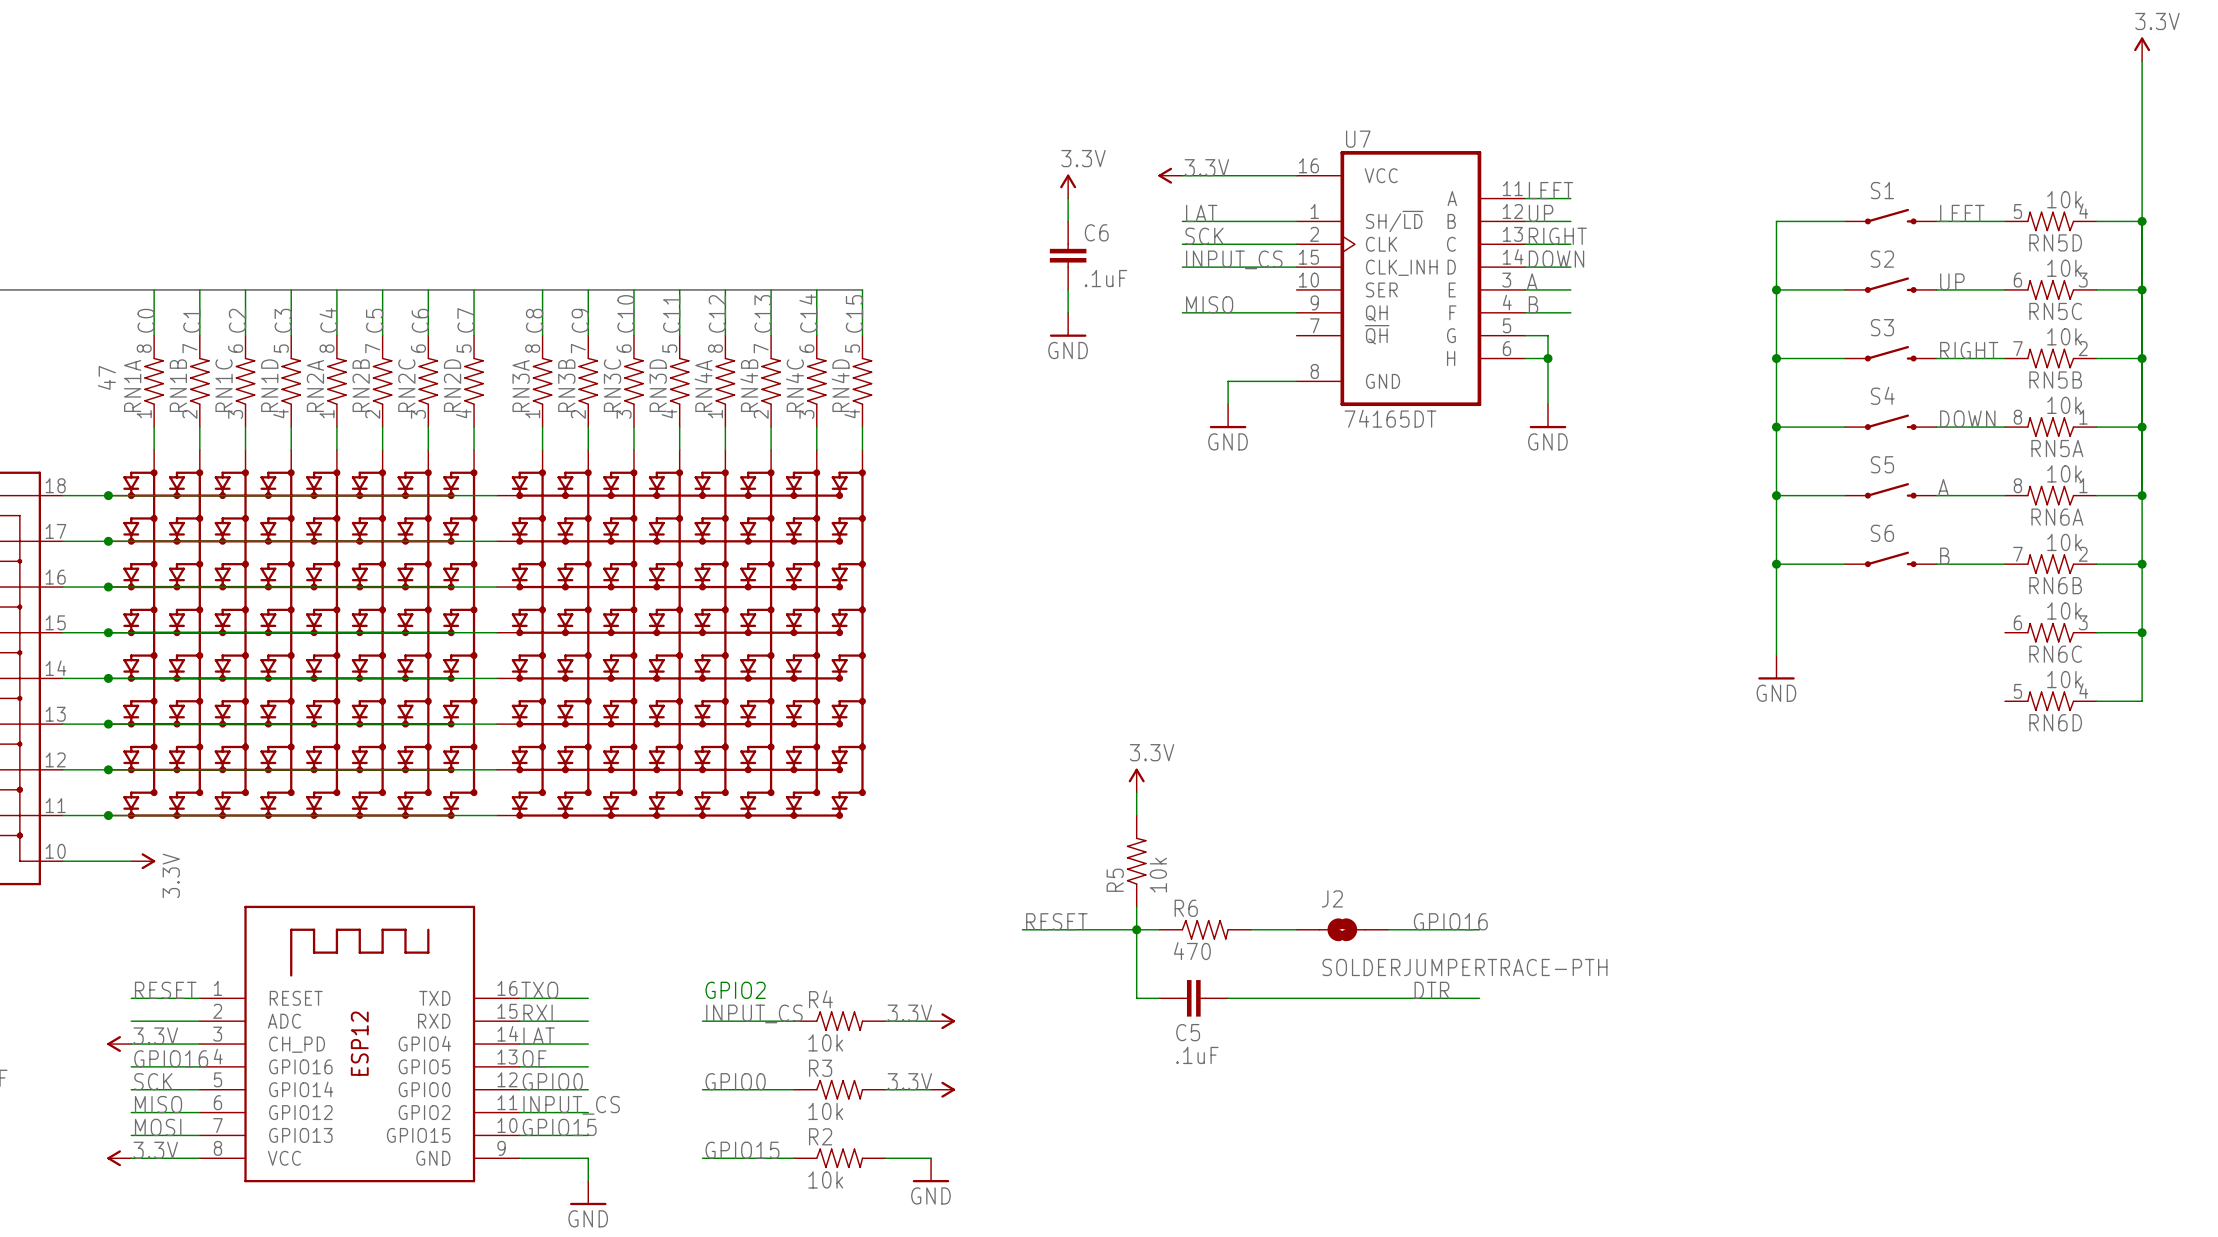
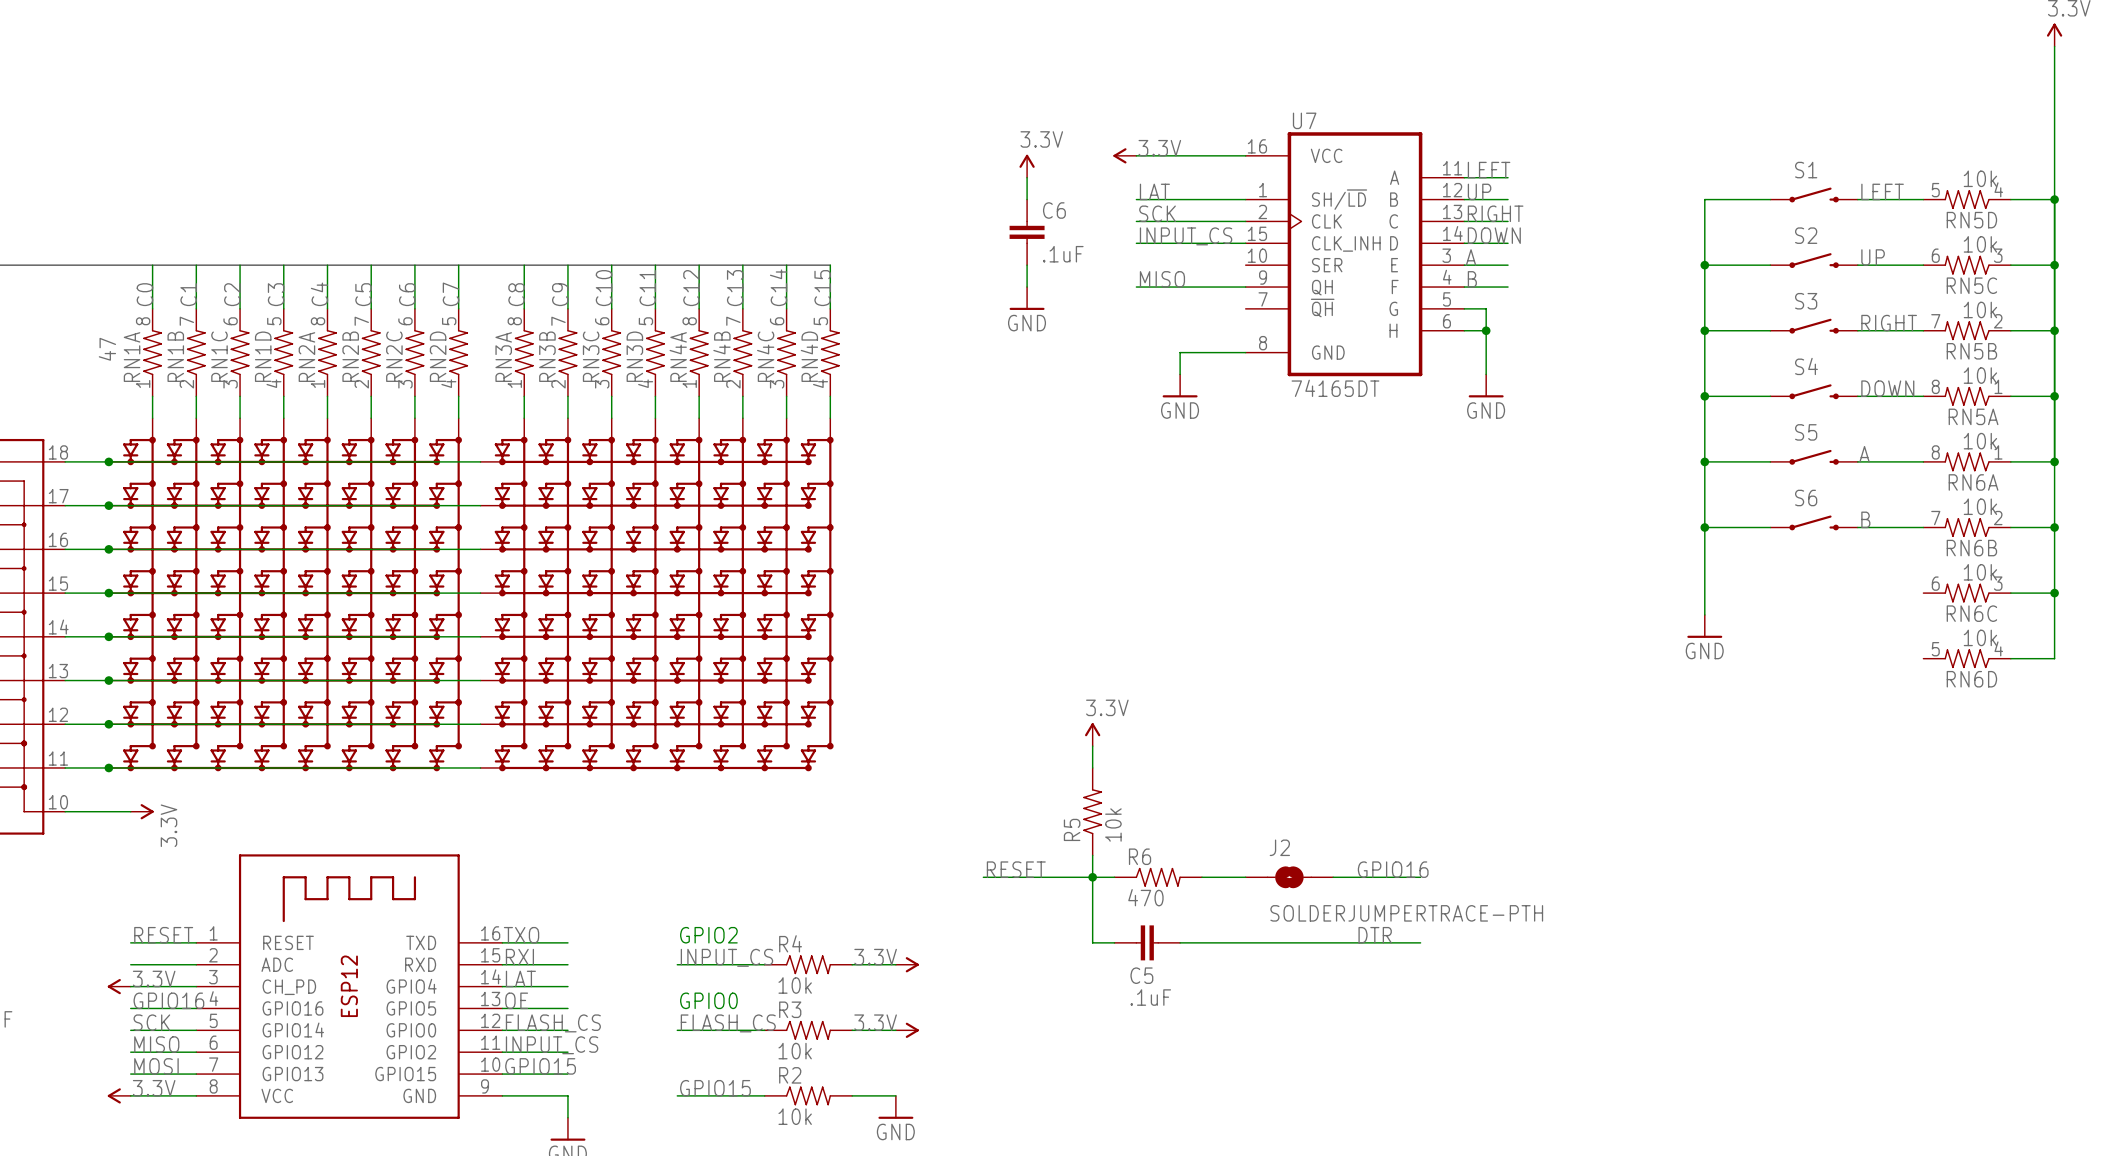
text: none -> GPIO0 (708, 1000)
label: GPIO0 (552, 1081) -> FLASH_CS (553, 1023)
label: GPIO0 (735, 1081) -> FLASH_CS (728, 1023)

